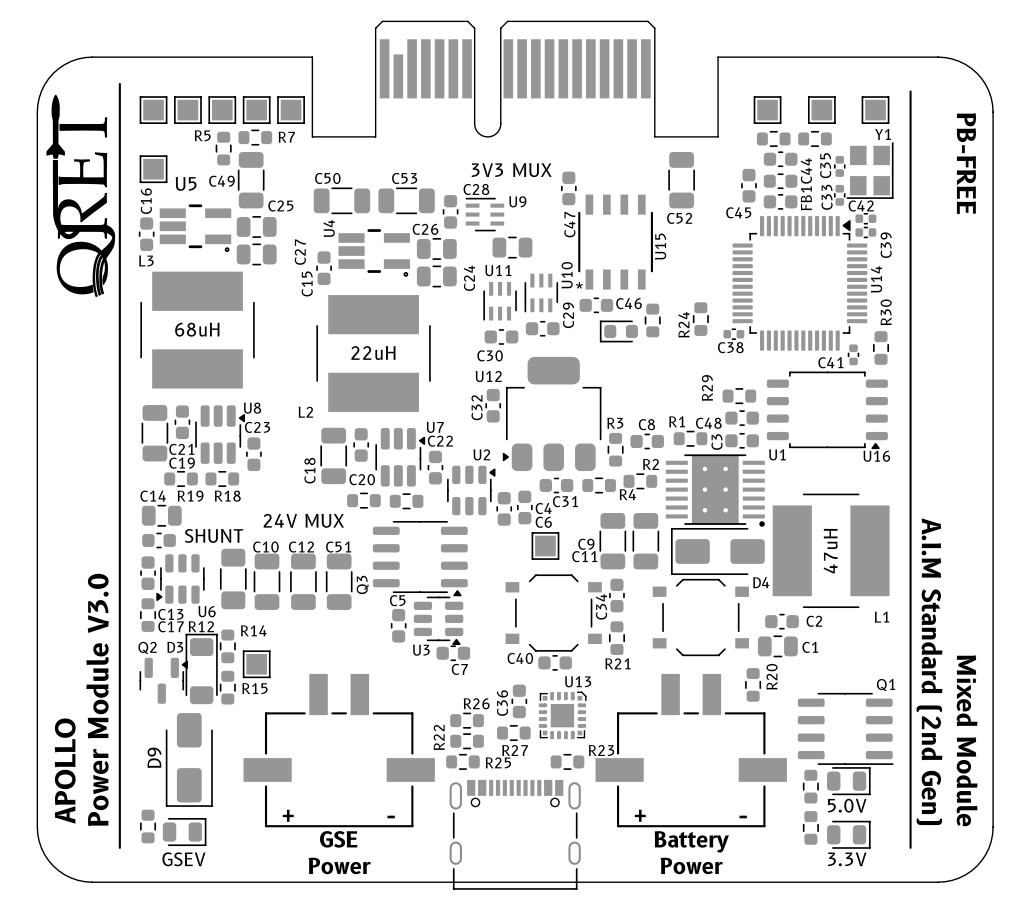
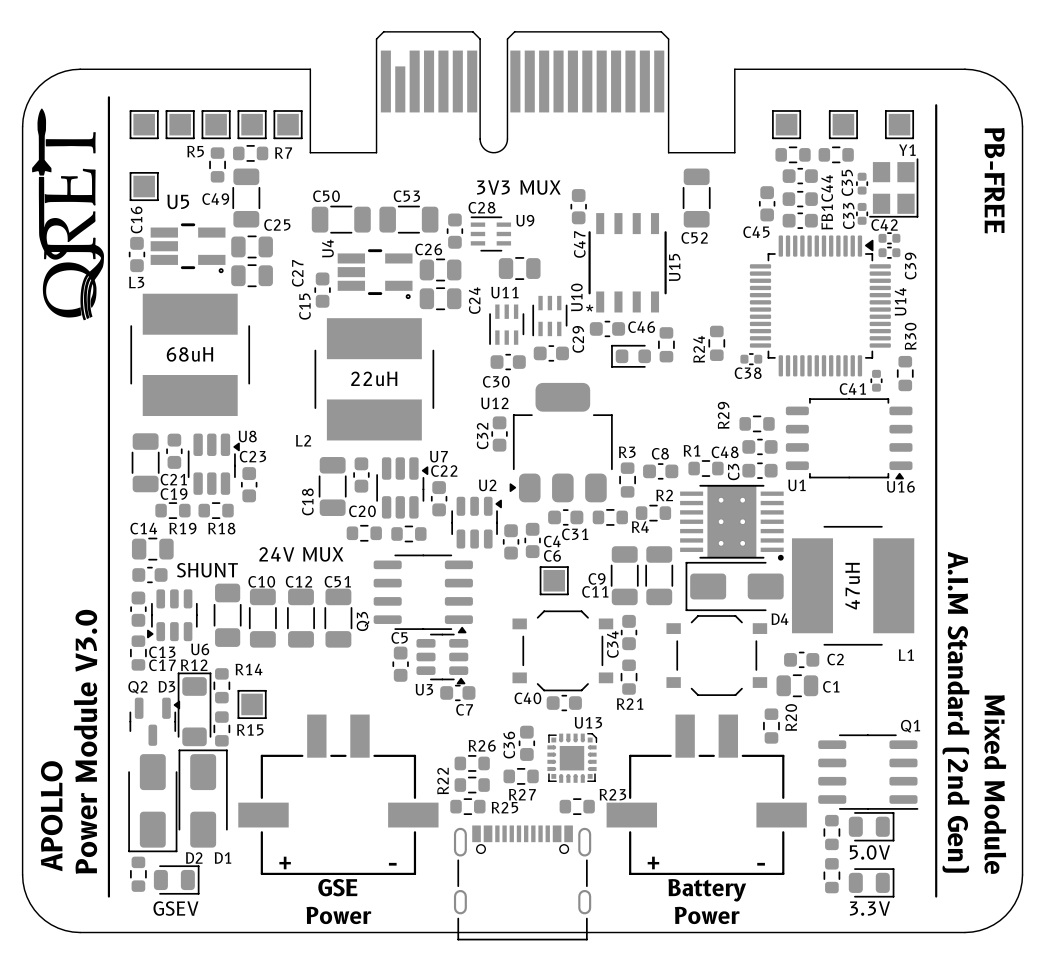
D1: none -> (203, 798)
D2: none -> (152, 803)
D9: (189, 759) -> none

